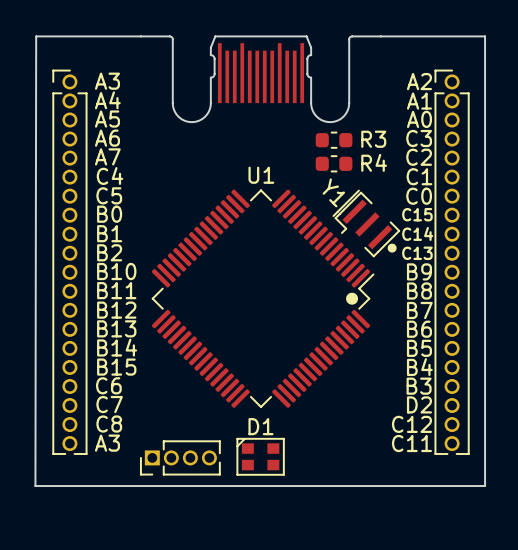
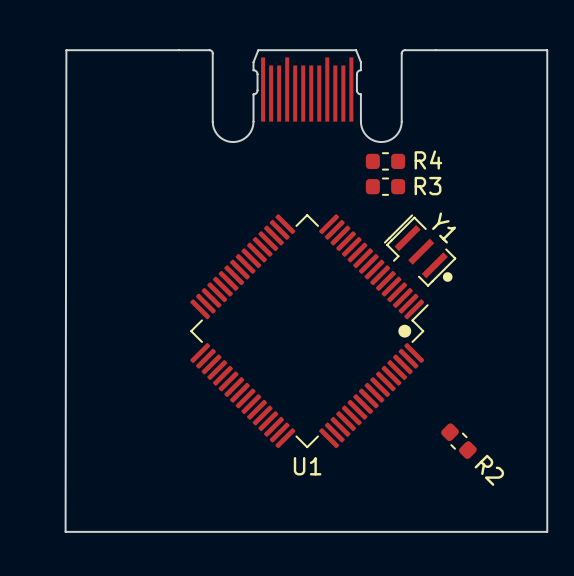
text: A3 (107, 81) -> none
text: A2 (419, 81) -> none
text: A4 (107, 100) -> none
text: A1 (419, 101) -> none
text: A5 (107, 119) -> none
text: A0 (419, 119) -> none
text: A6 (107, 138) -> none
text: C3 (419, 138) -> none
R3 name: R3 (373, 139) -> R4 (428, 160)
text: A7 (107, 156) -> none
text: C2 (419, 157) -> none
R4 name: R4 (374, 162) -> R3 (428, 186)
U1 name position: U1 (261, 175) -> U1 (307, 466)
text: C4 (109, 176) -> none
text: C1 (419, 176) -> none
Y1 name position: Y1 (333, 192) -> Y1 (444, 228)
text: C5 (109, 195) -> none
text: C0 (419, 196) -> none
text: B0 (109, 214) -> none
text: C15 (417, 214) -> none
text: B1 (109, 233) -> none
text: C14 (417, 233) -> none
text: B2 (109, 252) -> none
text: C13 (417, 253) -> none
part: (69, 262) -> none
part: (452, 262) -> none
text: B10 (116, 271) -> none
text: B9 (419, 271) -> none
text: B11 (116, 290) -> none
text: B8 (419, 291) -> none
text: B12 (116, 310) -> none
text: B7 (419, 310) -> none
text: B13 (116, 328) -> none
text: B6 (419, 329) -> none
text: B14 (117, 347) -> none
text: B5 (419, 348) -> none
text: B15 (116, 367) -> none
text: B4 (419, 367) -> none
text: C6 (108, 385) -> none
text: B3 (419, 386) -> none
R2: none -> (458, 441)
text: C7 (109, 404) -> none
text: D2 (419, 404) -> none
text: C8 (109, 424) -> none
text: C12 (411, 424) -> none
text: A3 (107, 443) -> none
text: C11 (411, 443) -> none
D1: (260, 456) -> none
part: (180, 457) -> none

